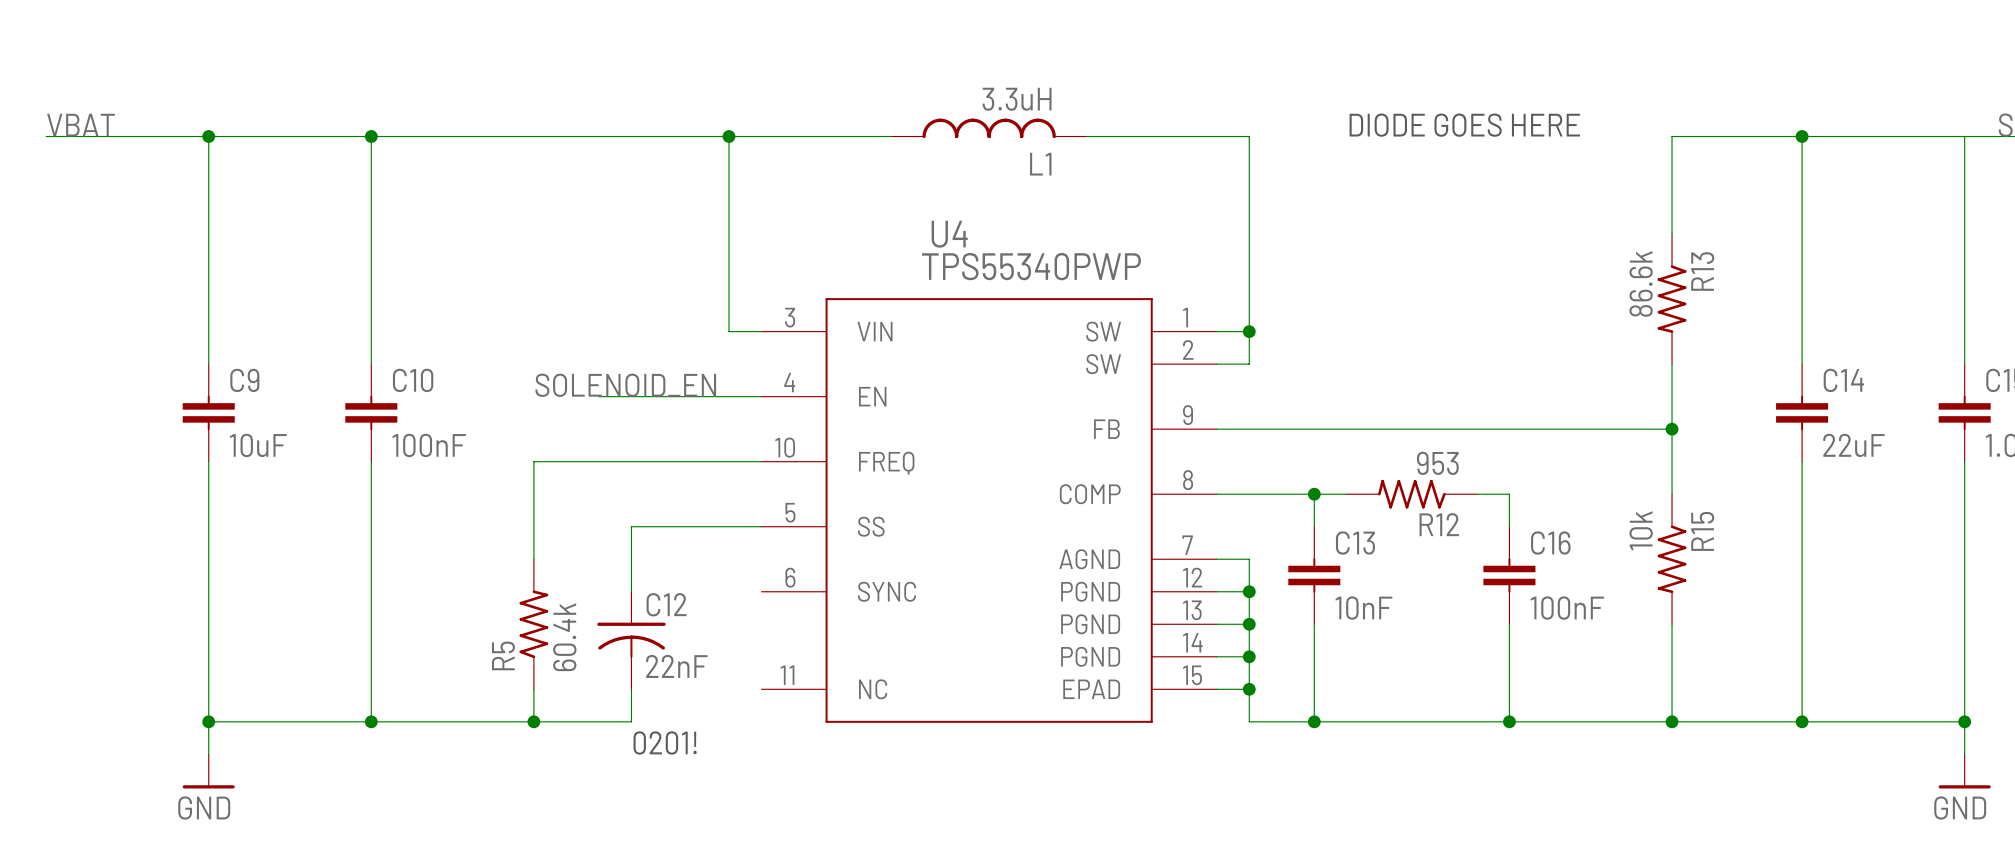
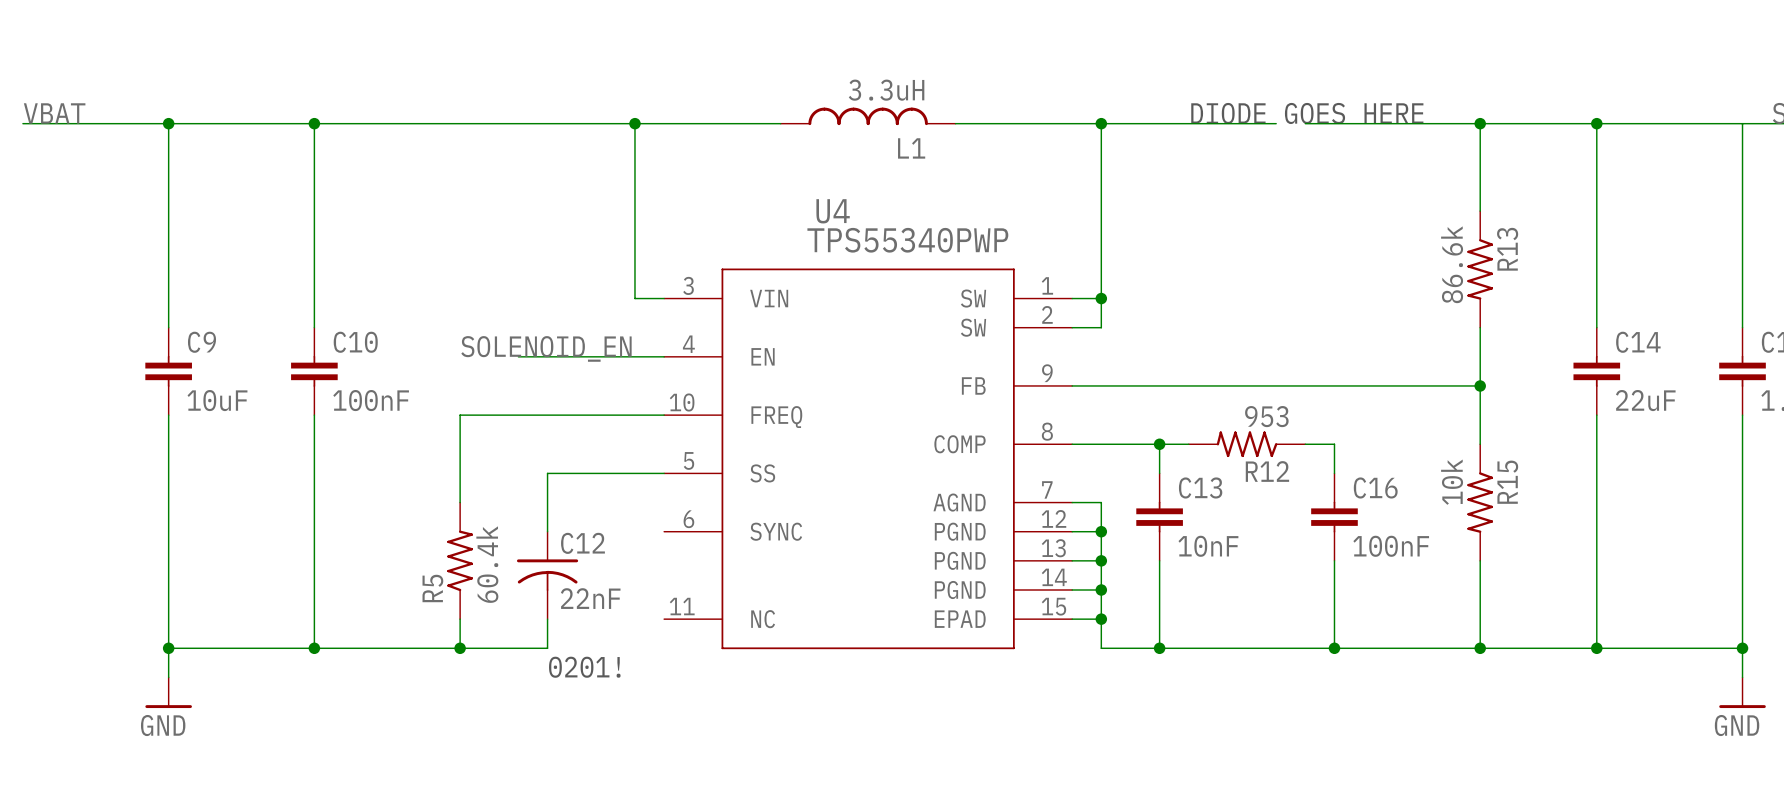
wire: none -> (1101, 123) (1276, 123)
junction: none -> (1101, 123)
wire: none -> (1305, 123) (1480, 123)
junction: none -> (1480, 123)

